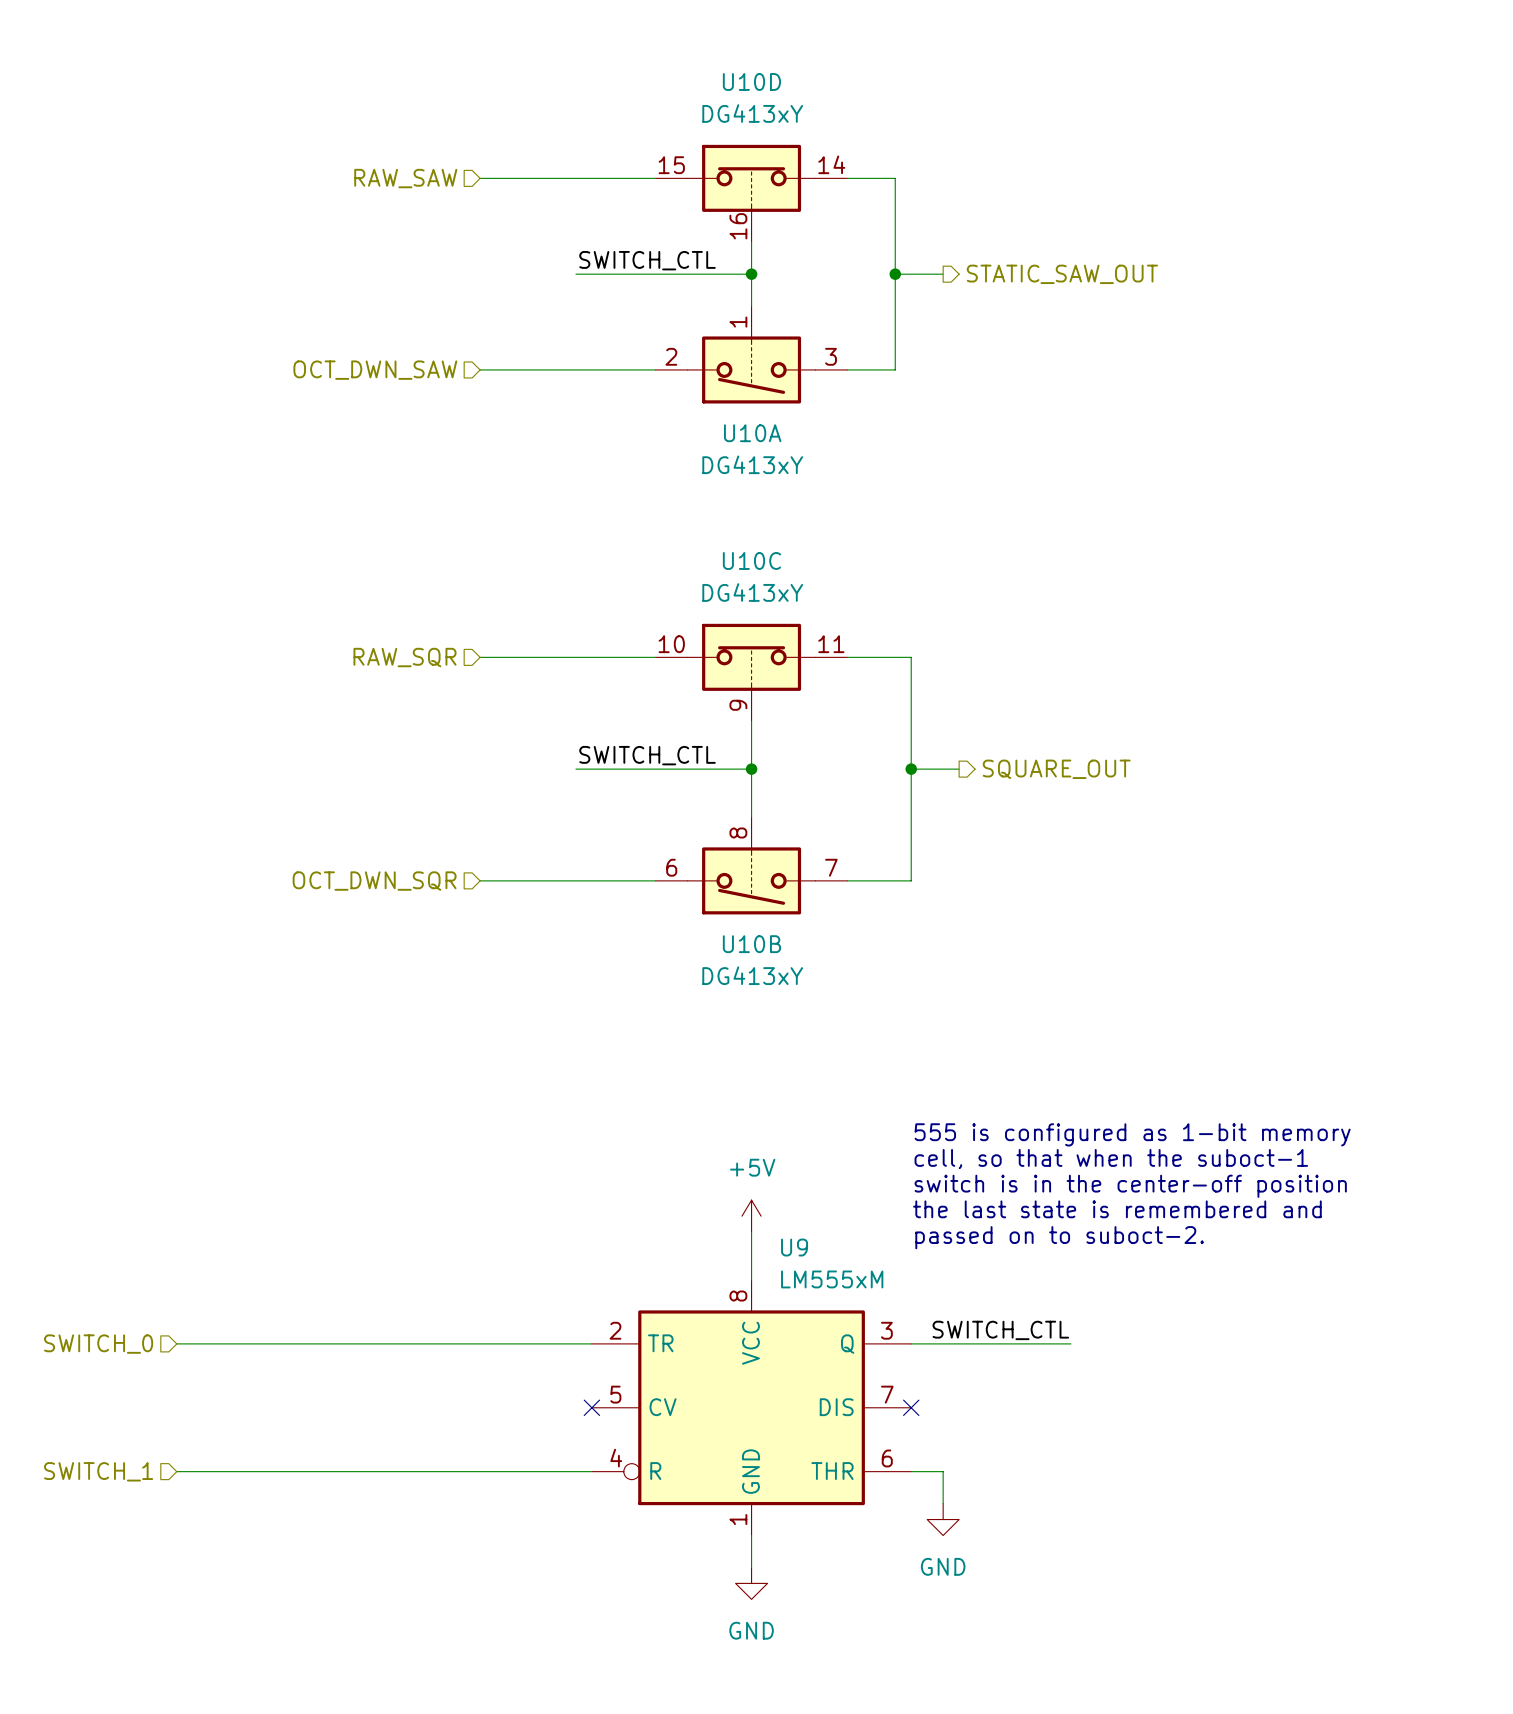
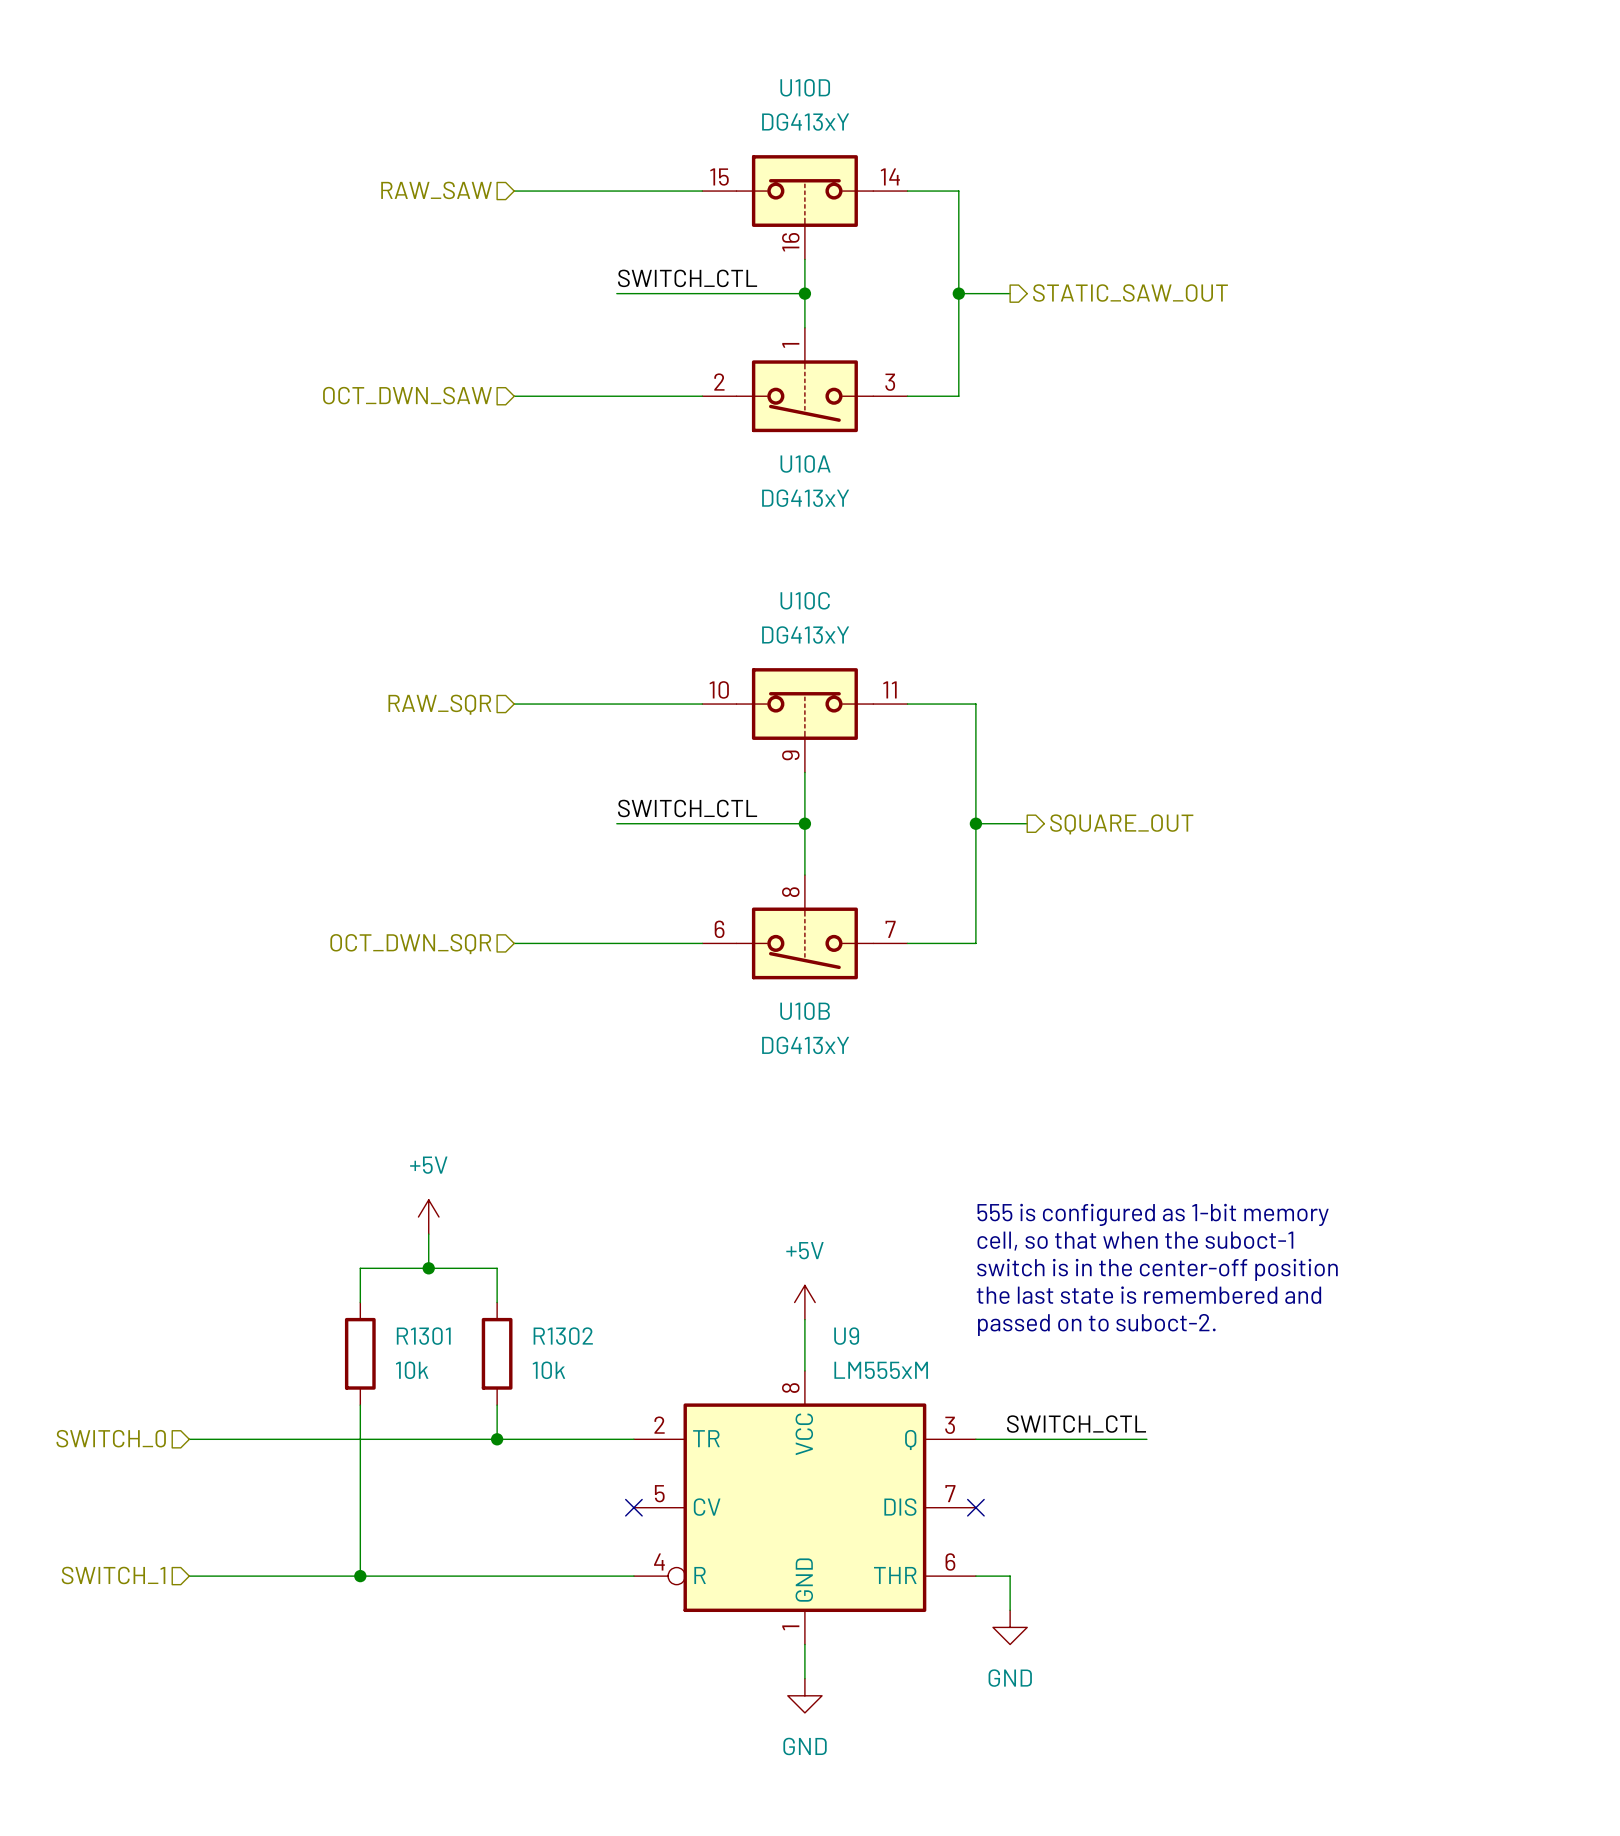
power symbol: none -> +5V (428, 1217)
wire: none -> (428, 1234) (428, 1268)
junction: none -> (428, 1268)
wire: none -> (360, 1302) (360, 1268) (497, 1268) (497, 1302)
R1301: none -> 10k (360, 1353)
R1302: none -> 10k (497, 1353)
wire: none -> (360, 1405) (360, 1576)
wire: none -> (497, 1405) (497, 1439)
junction: none -> (497, 1439)
junction: none -> (360, 1576)

